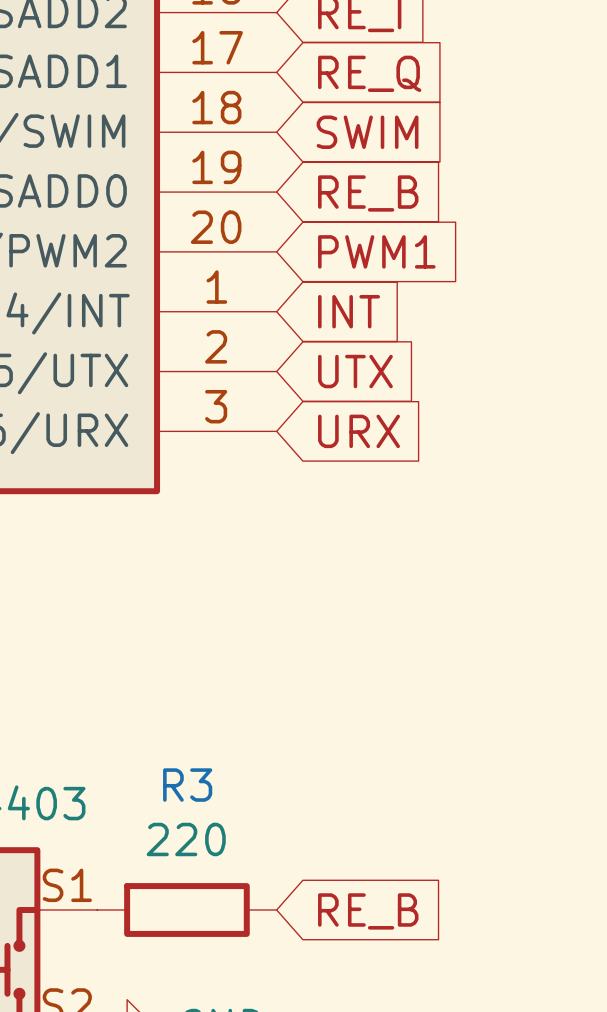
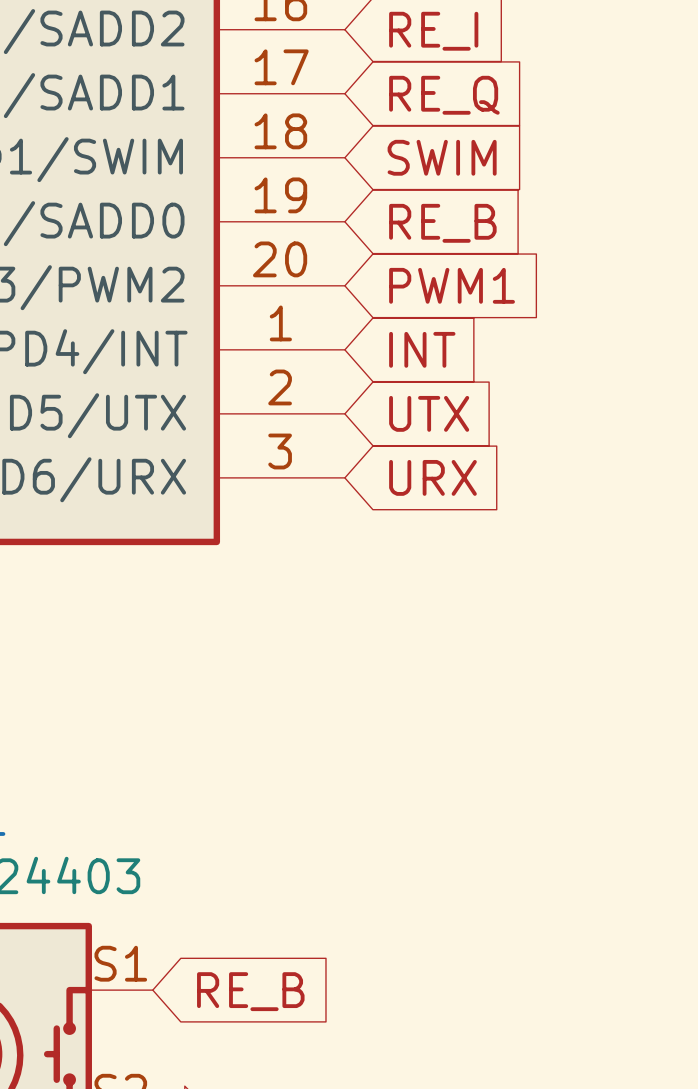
R3: 220 (186, 910) -> none
global label position: RE_B (368, 911) -> RE_B (250, 991)

